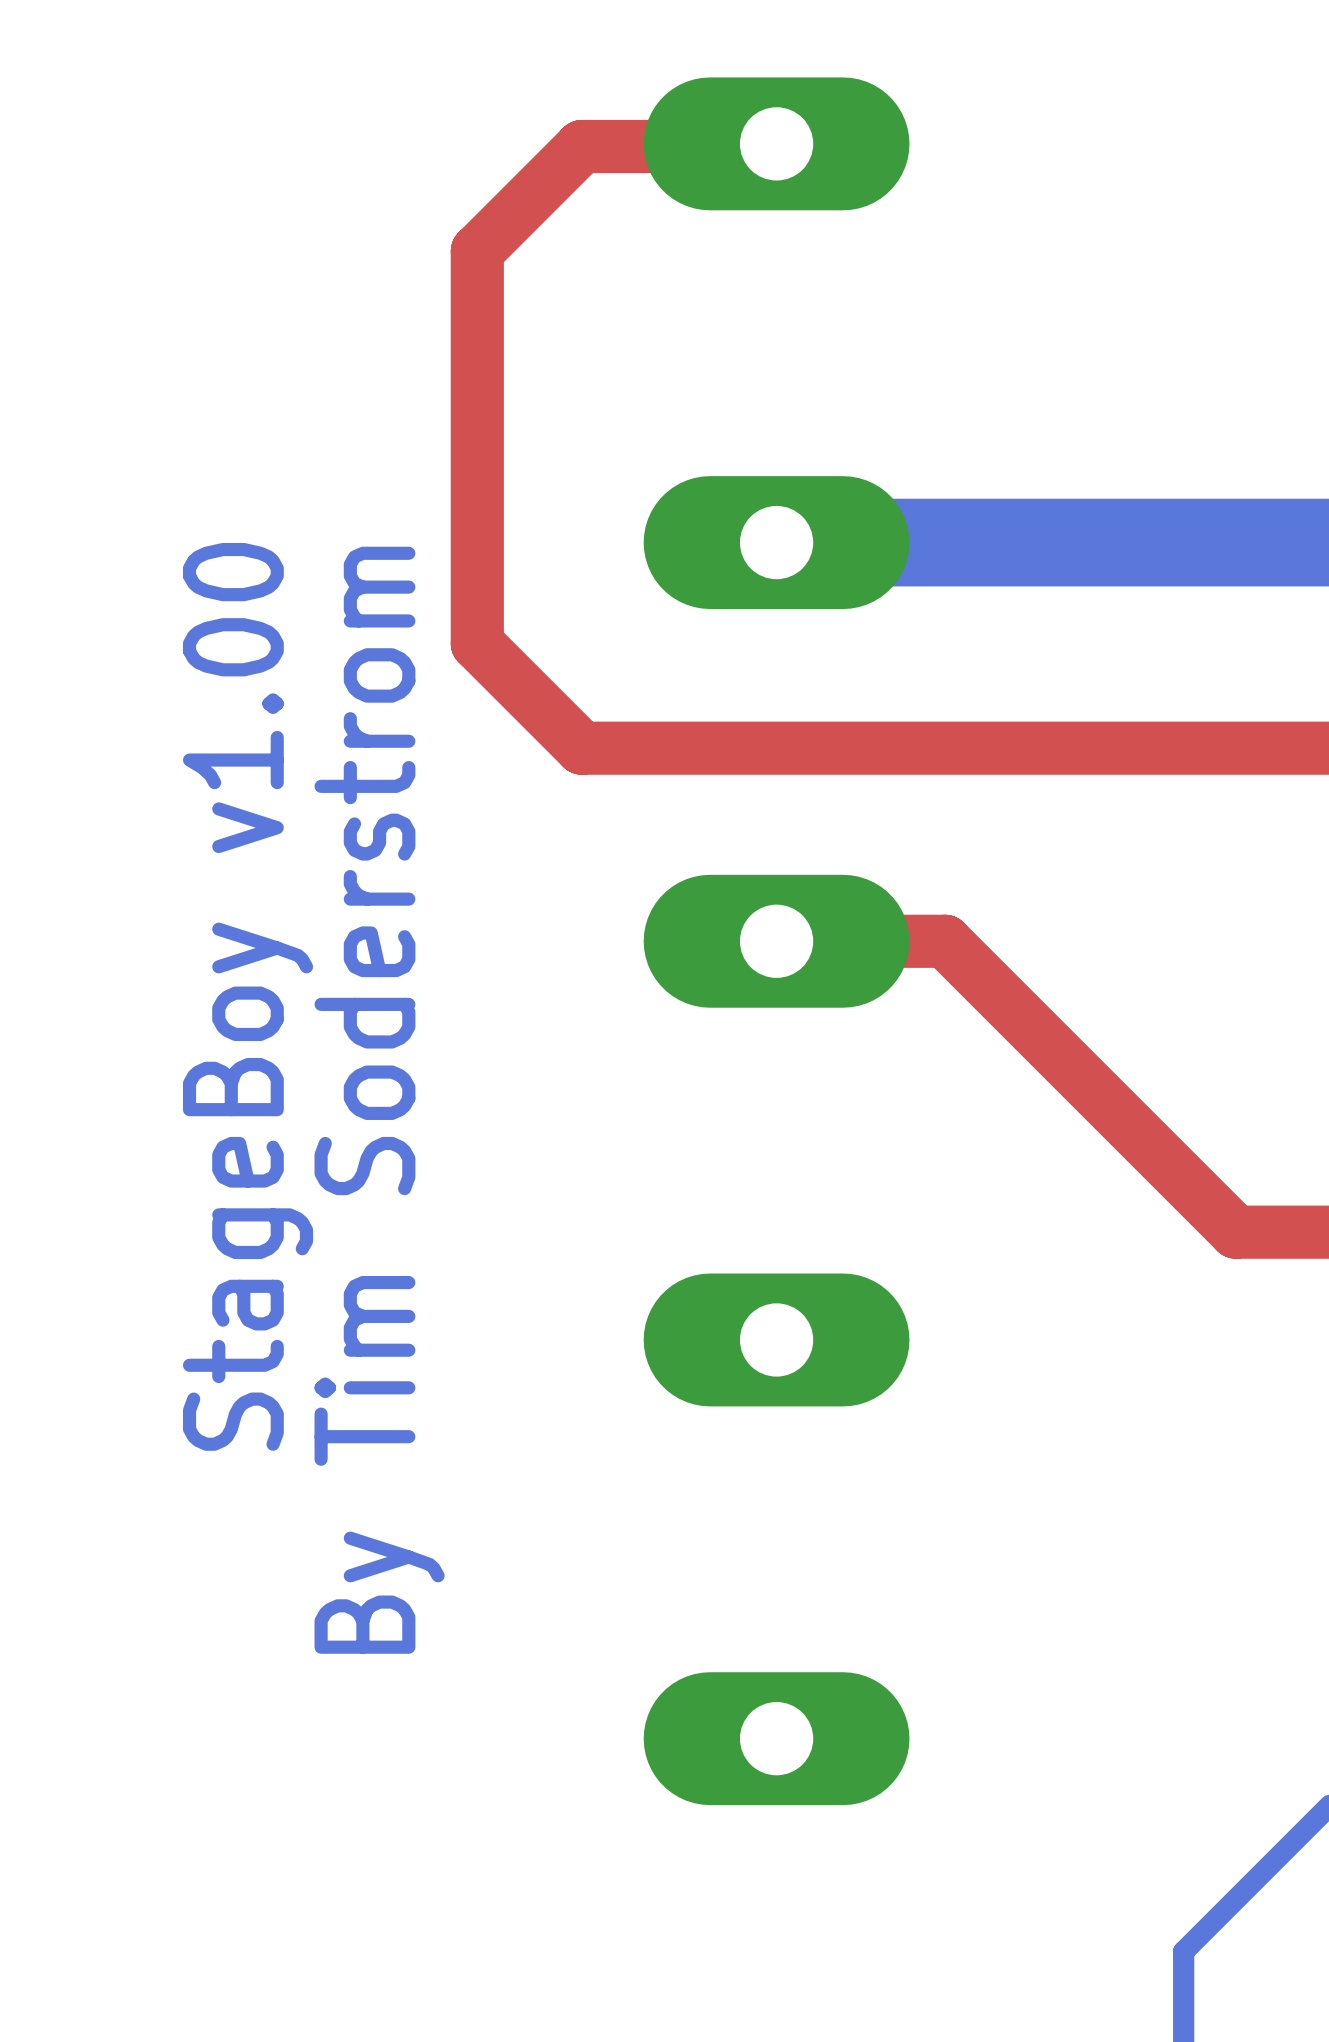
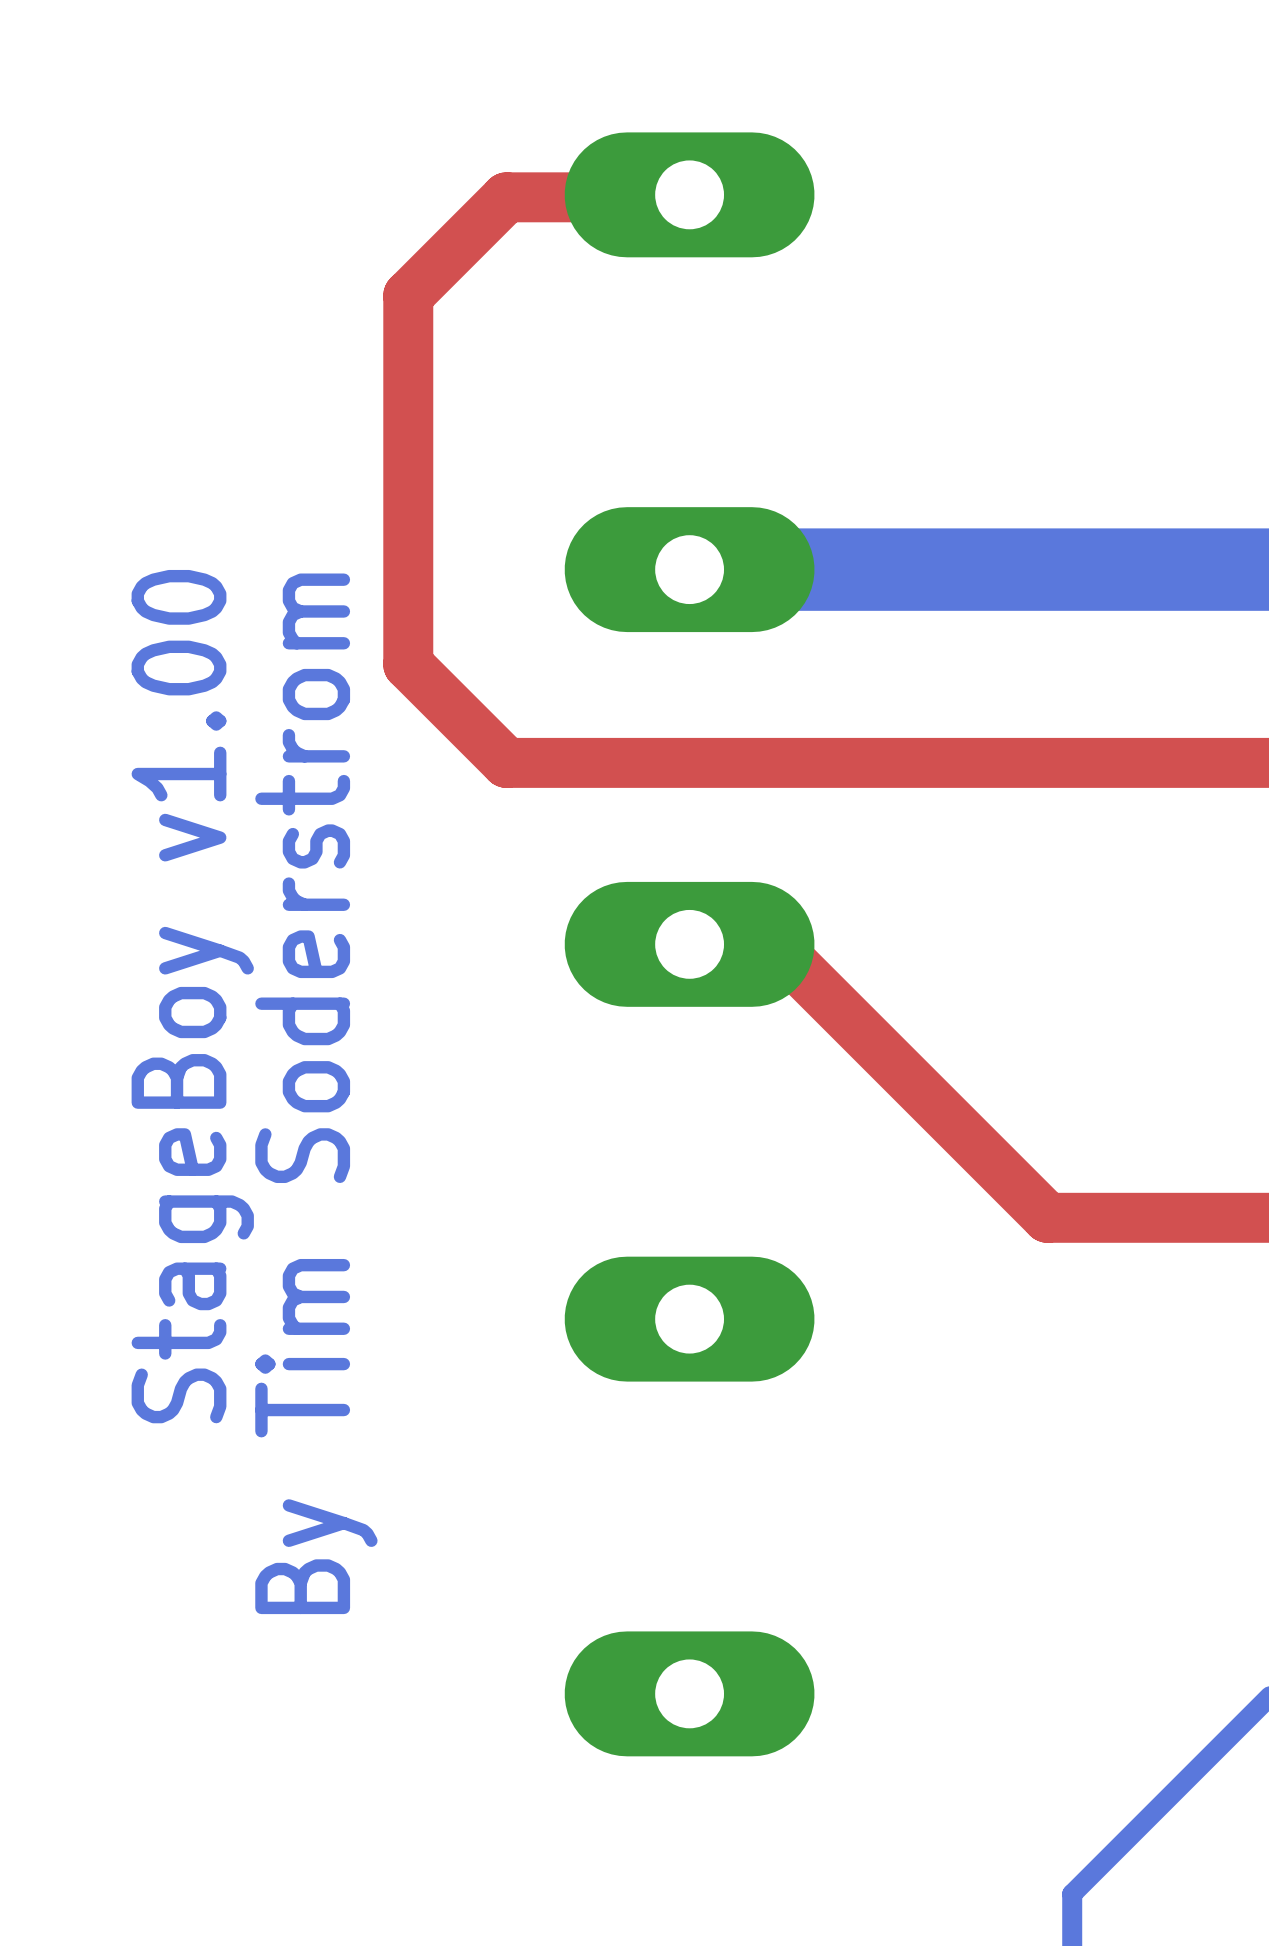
top track: (866, 941) (945, 941) (1235, 1232) -> (774, 944) (1047, 1217) (1121, 1217)

